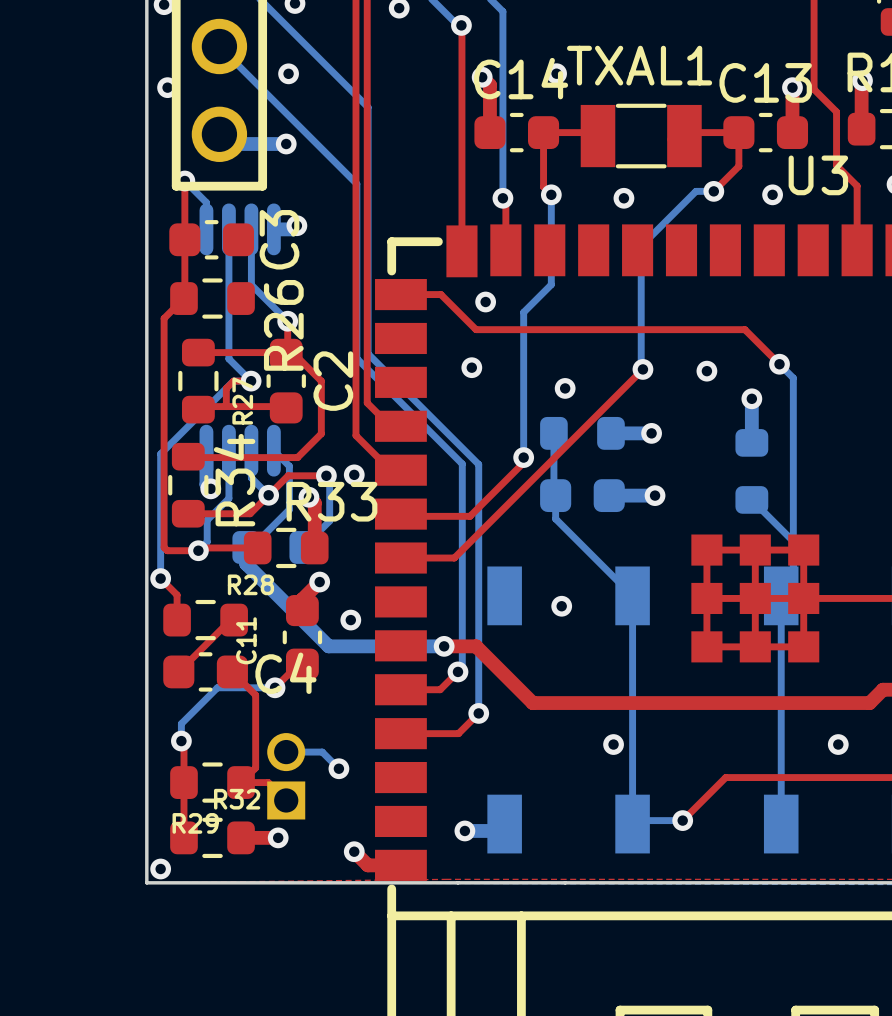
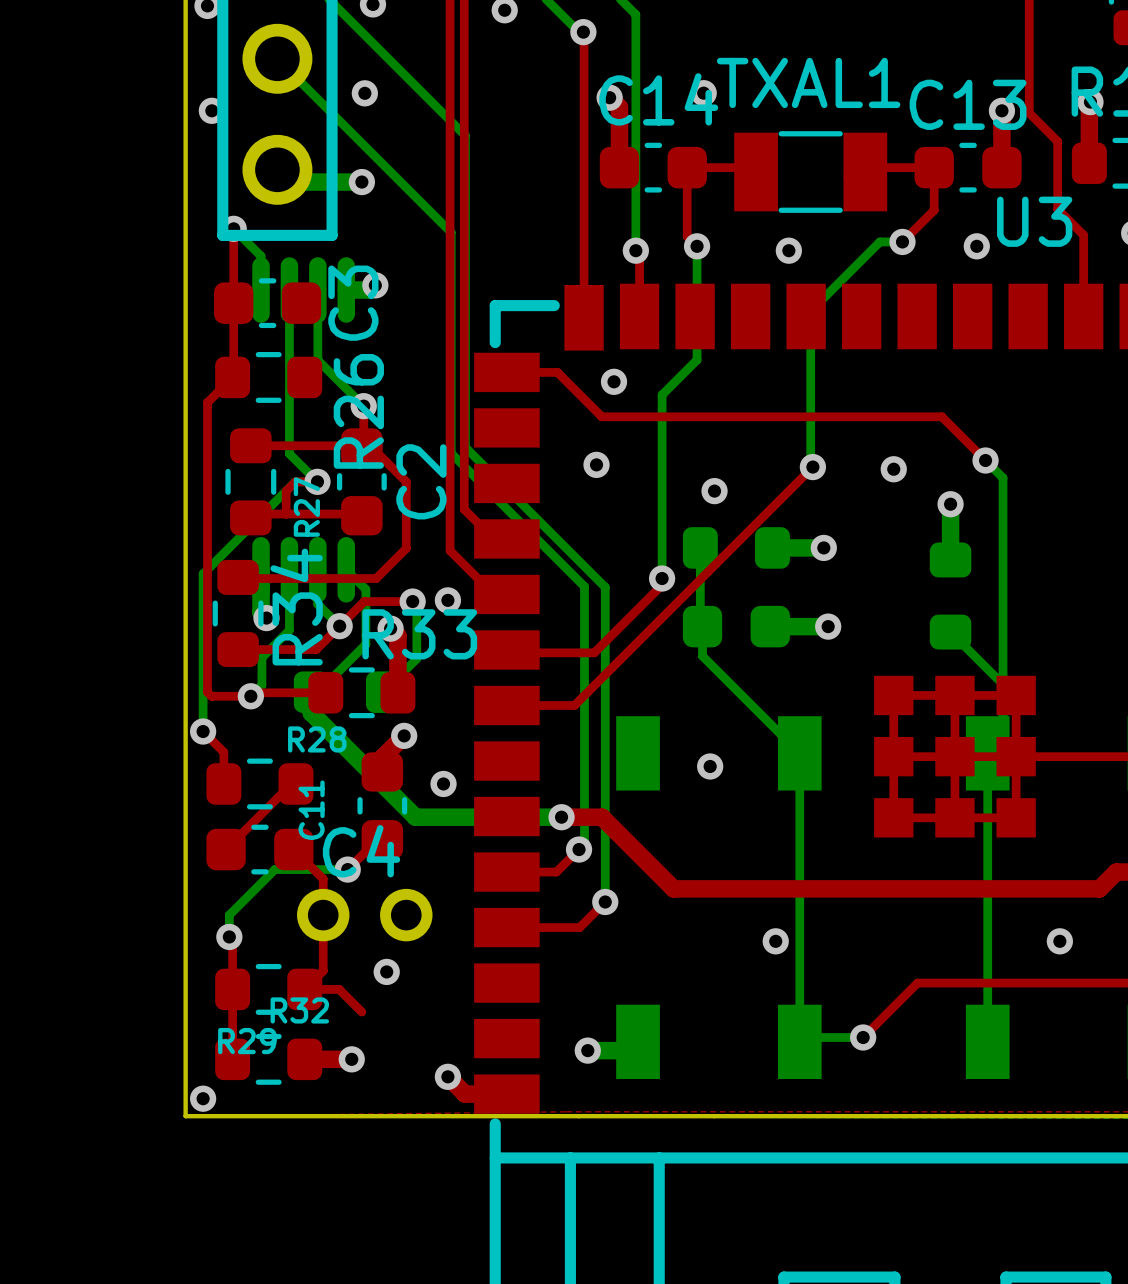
part: none -> (364, 915)
bottom track: (286, 752) (322, 752) (338, 768) -> none
via position: (338, 768) -> (386, 971)
part: (286, 776) -> none

